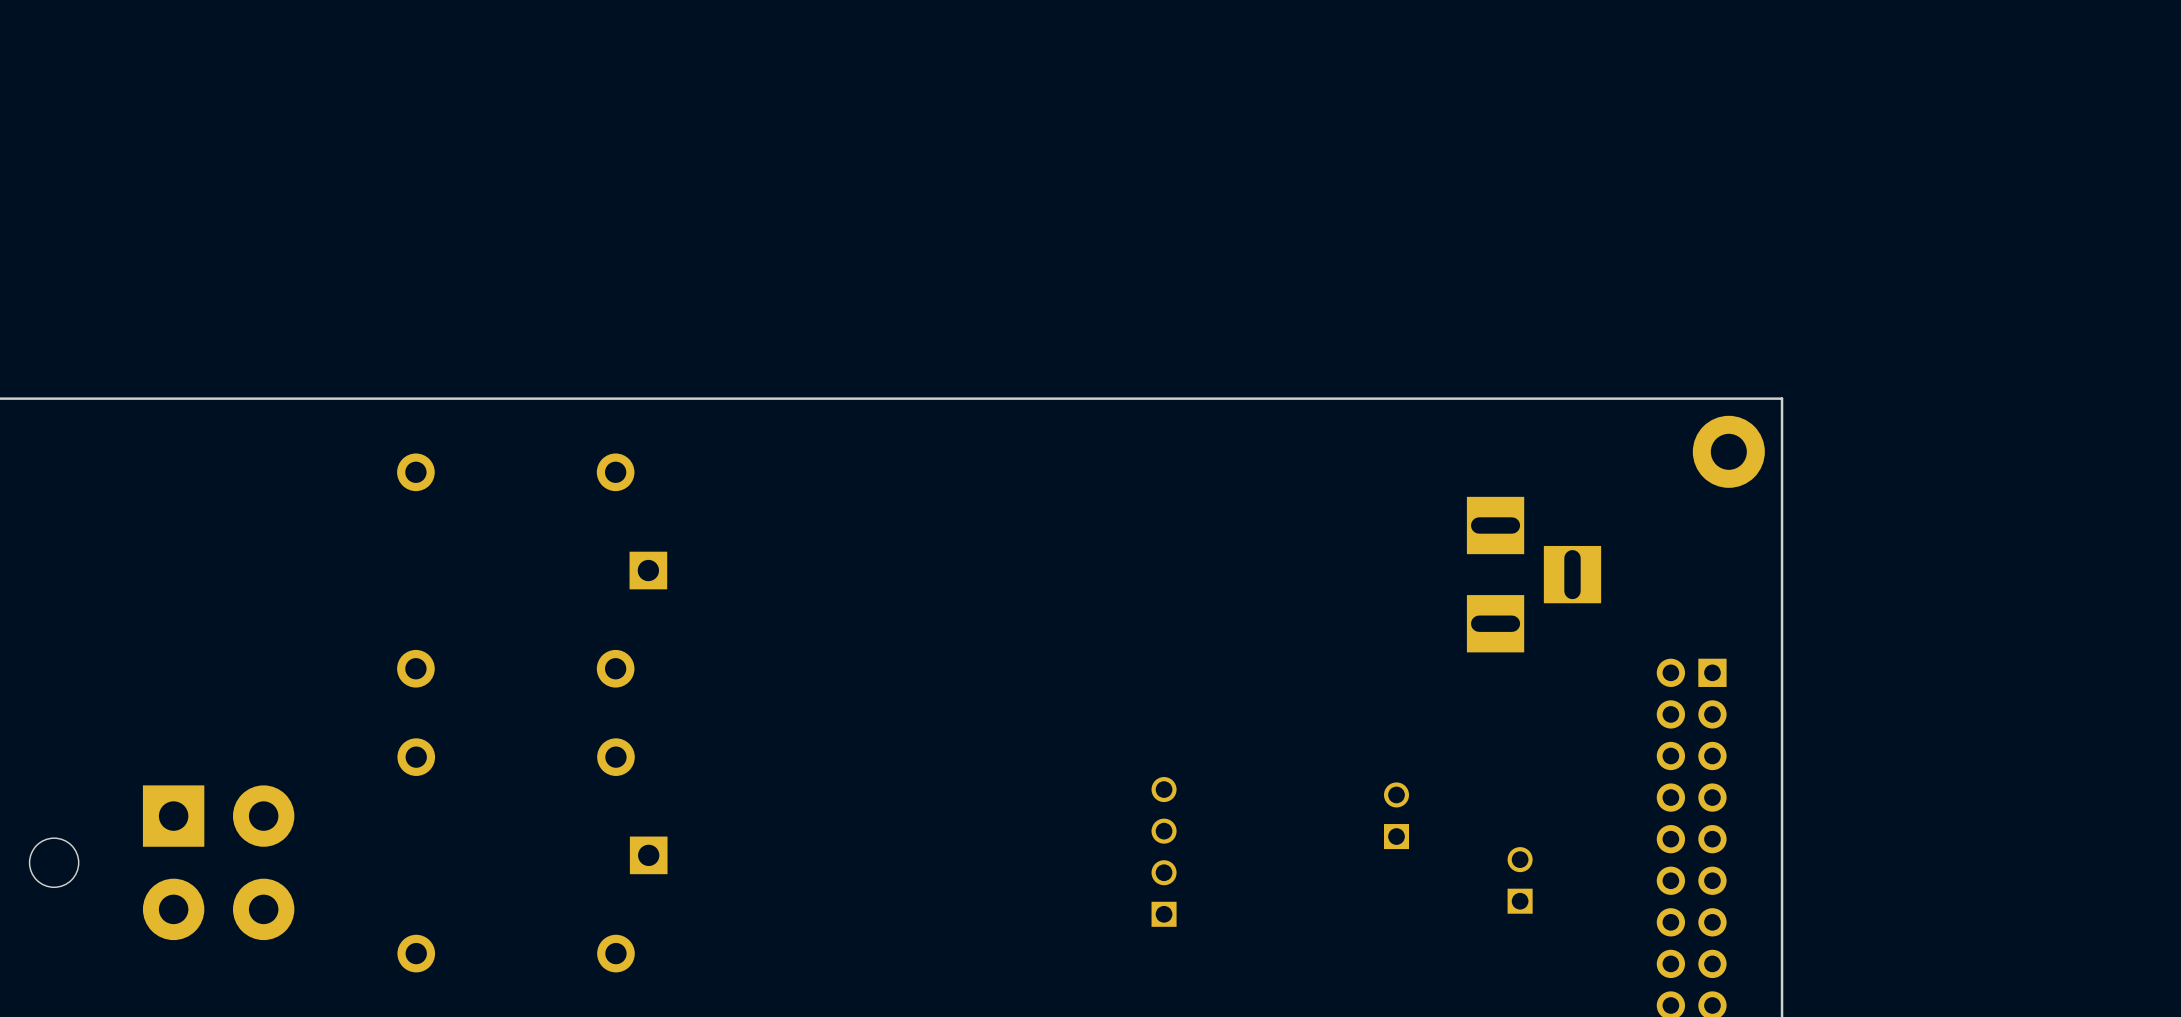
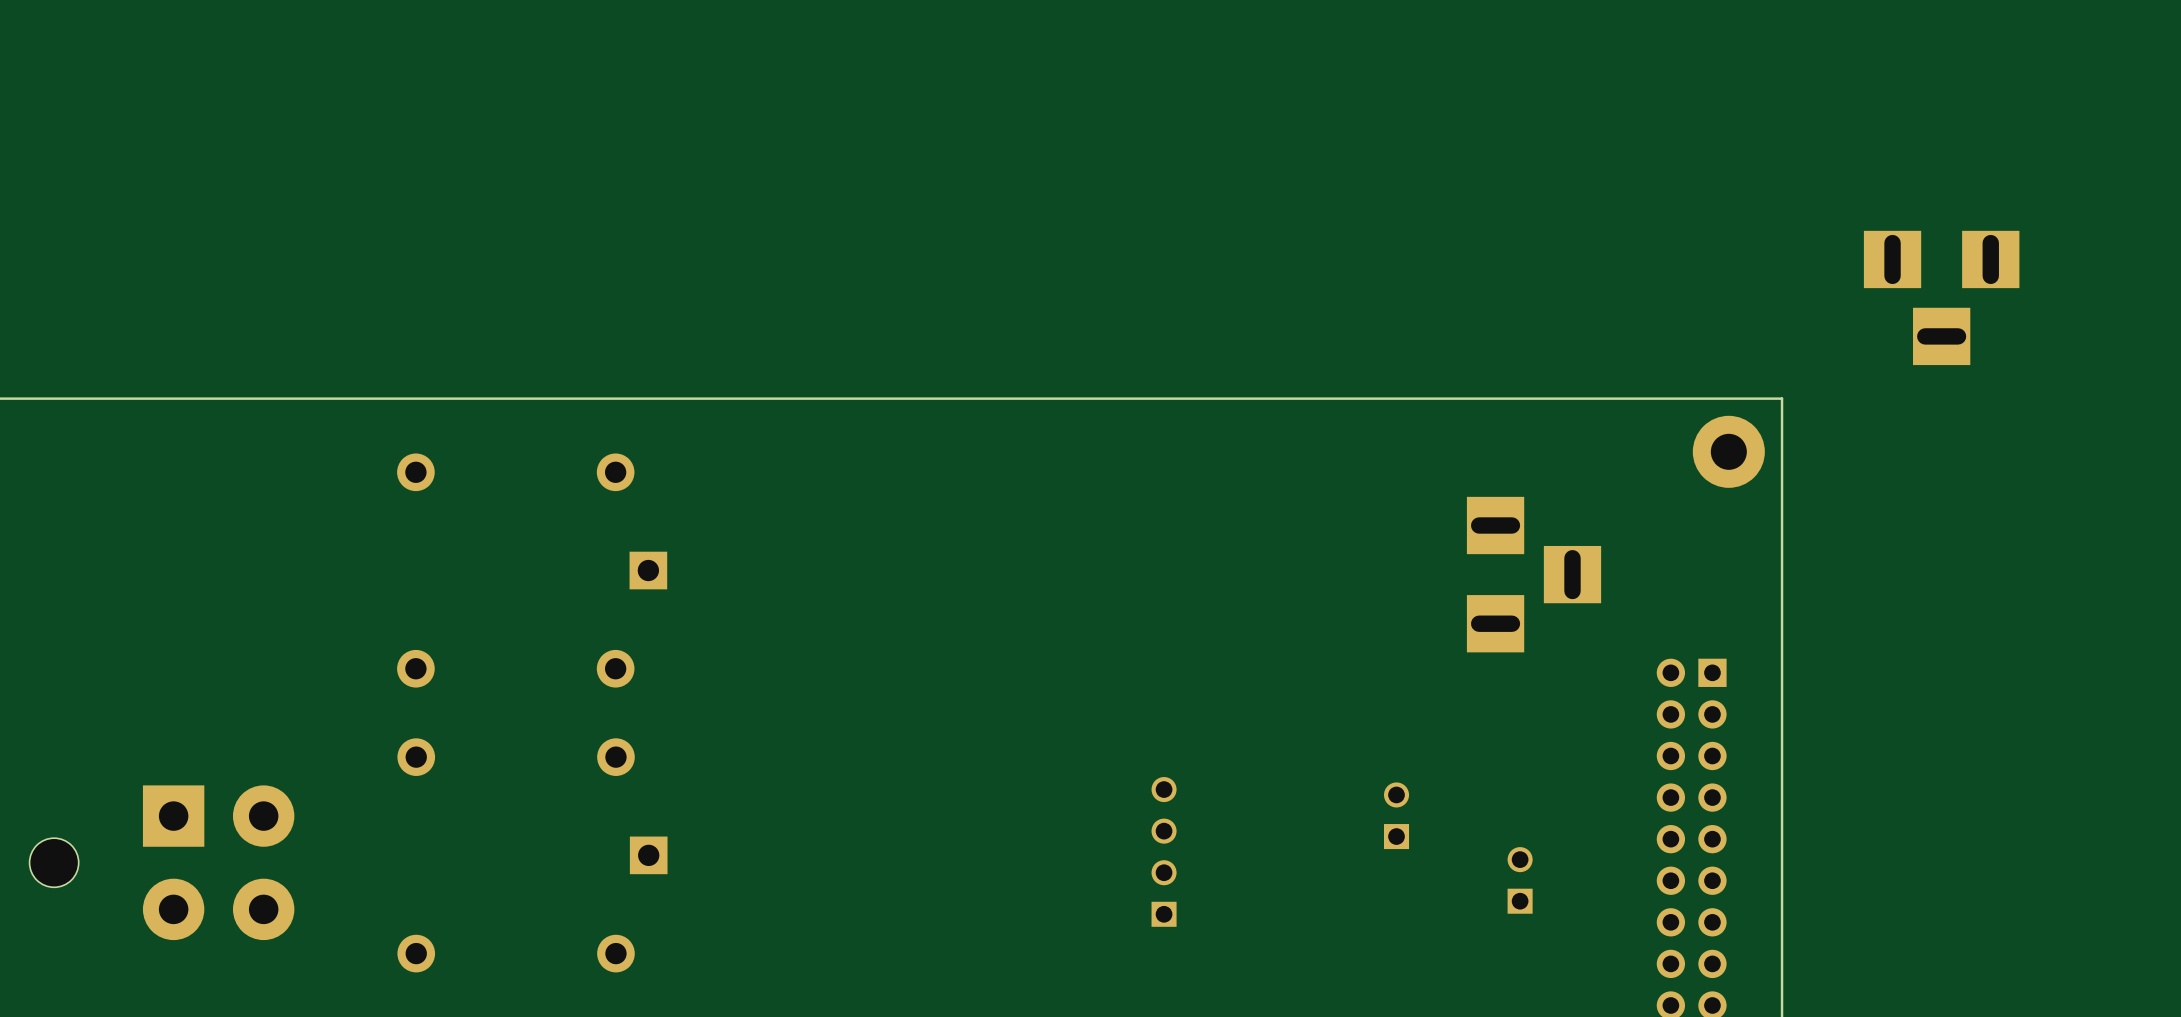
part: none -> (1941, 297)

